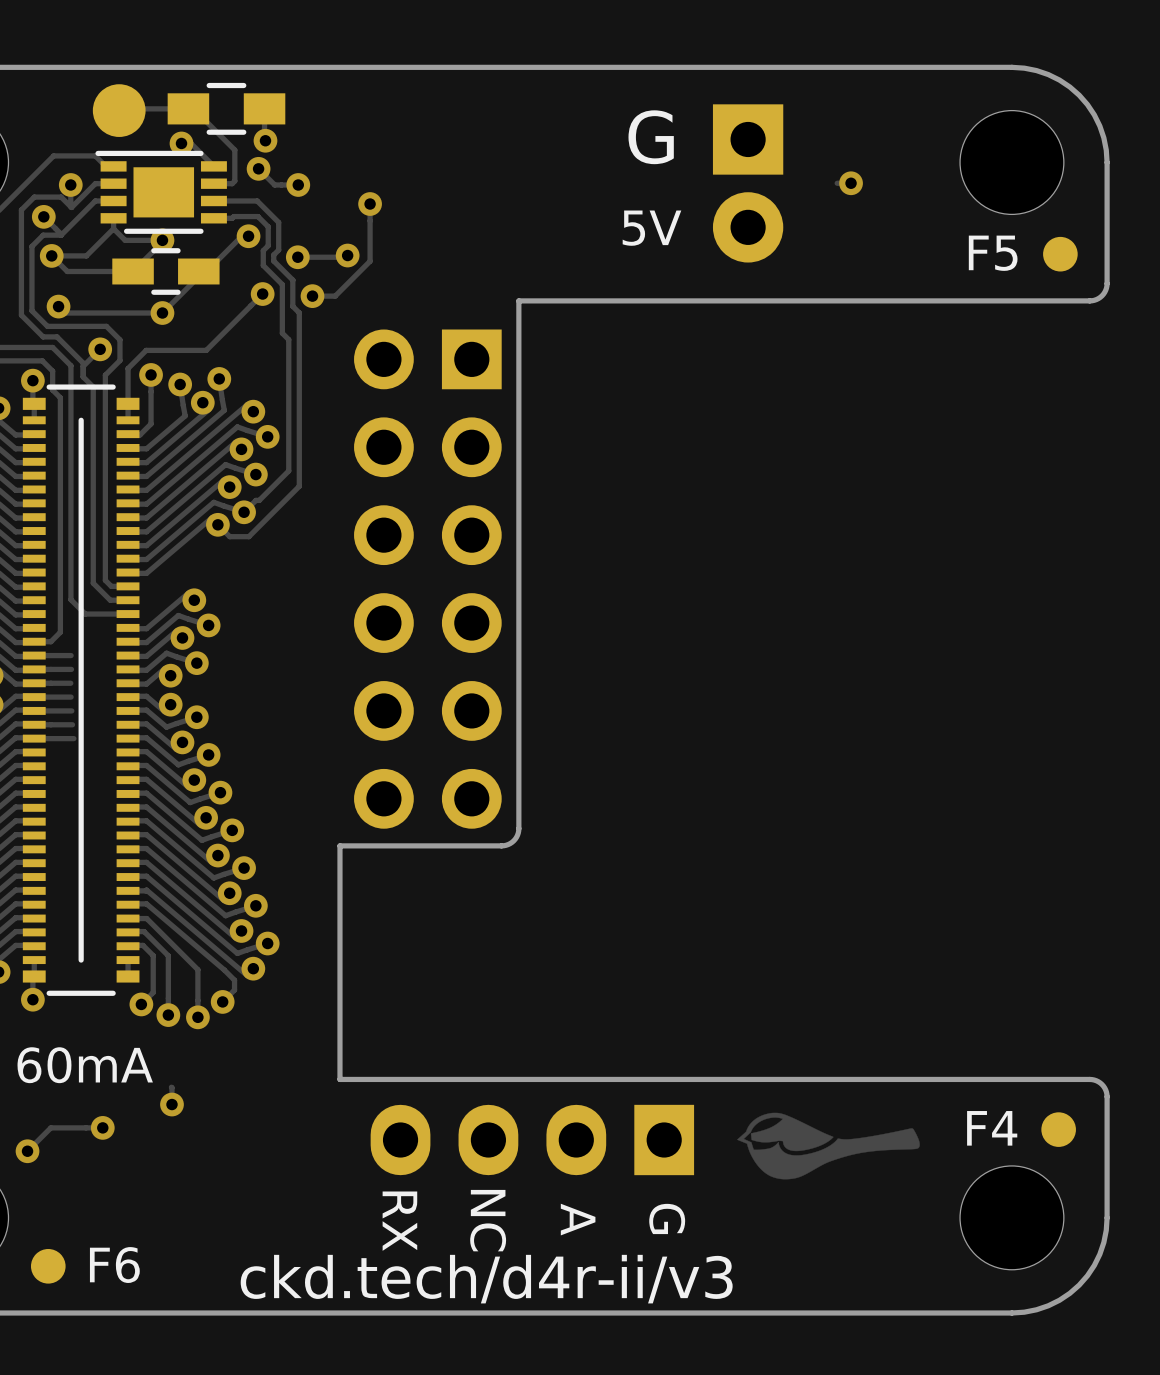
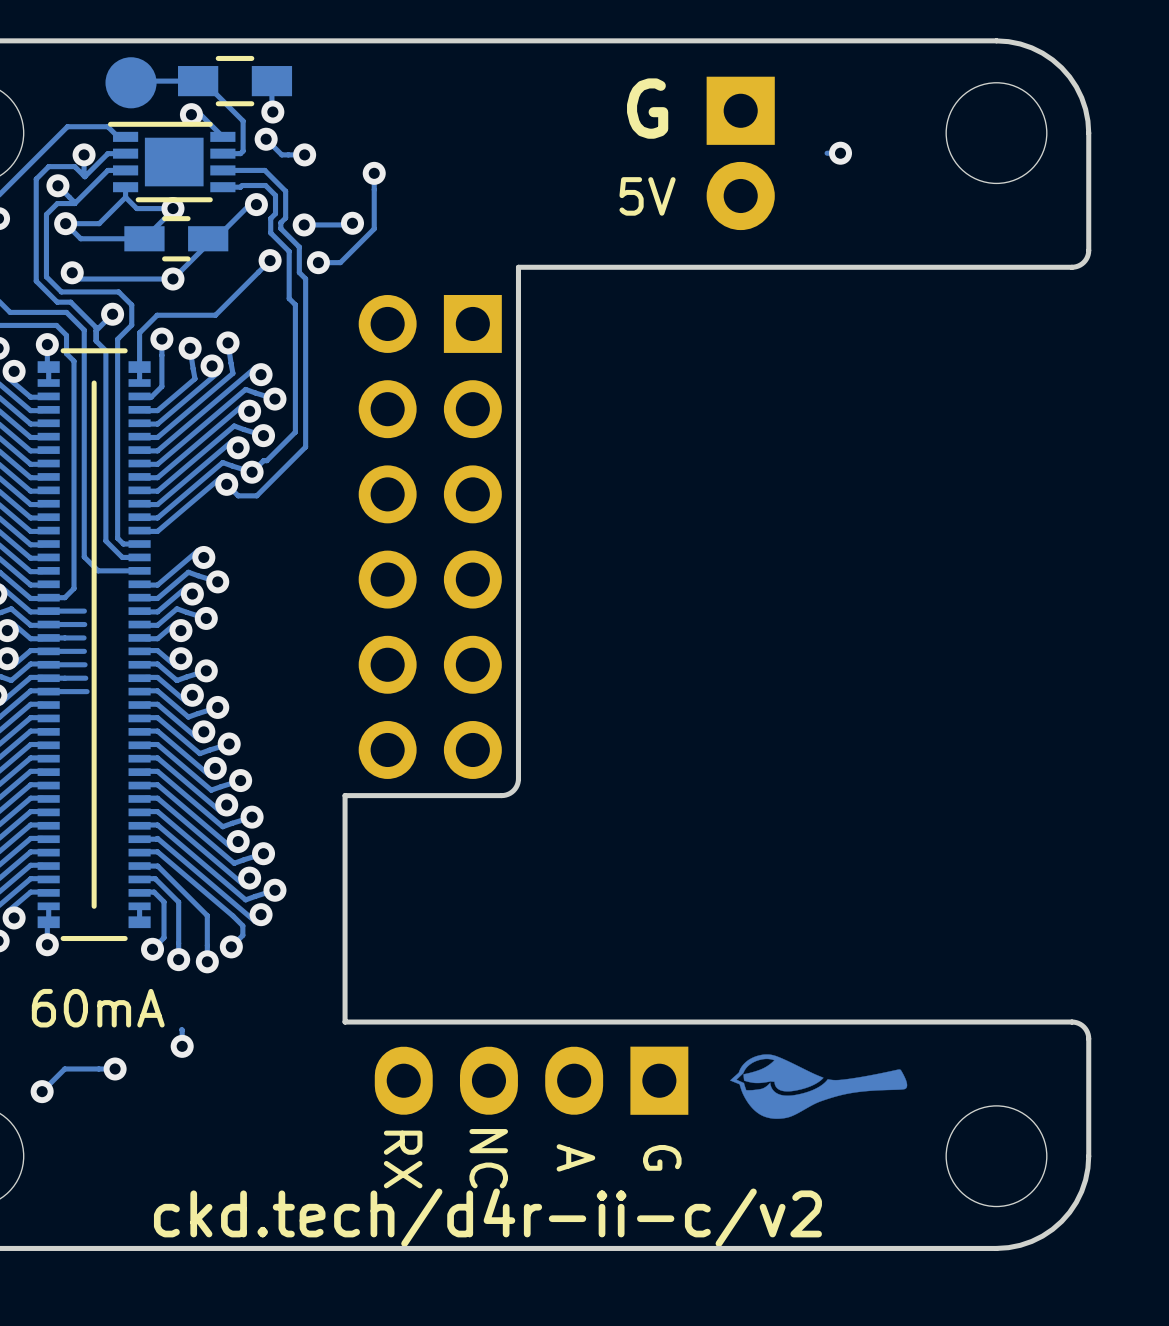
F5: (1060, 254) -> none
F4: (1058, 1129) -> none
F6: (48, 1266) -> none
text: ckd.tech/d4r-ii/v3 (486, 1279) -> ckd.tech/d4r-ii-c/v2 (487, 1217)

